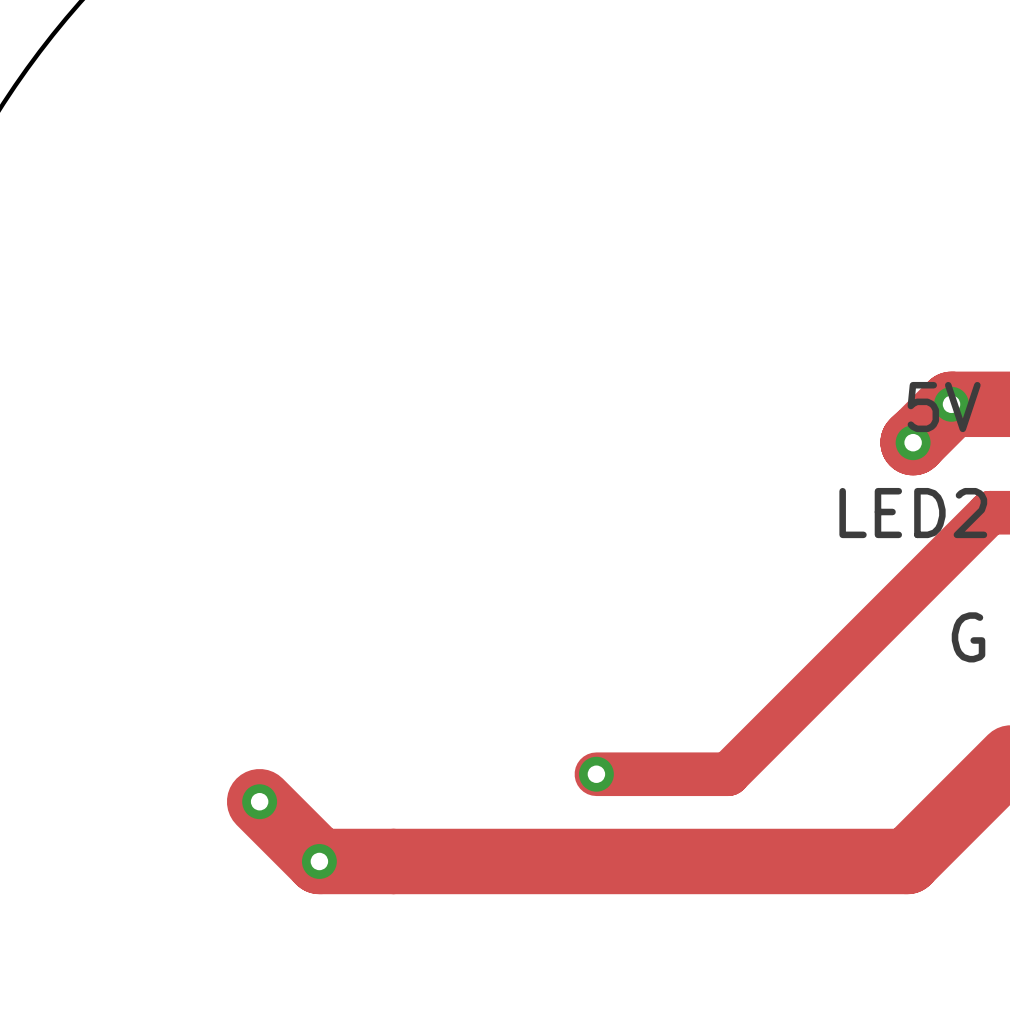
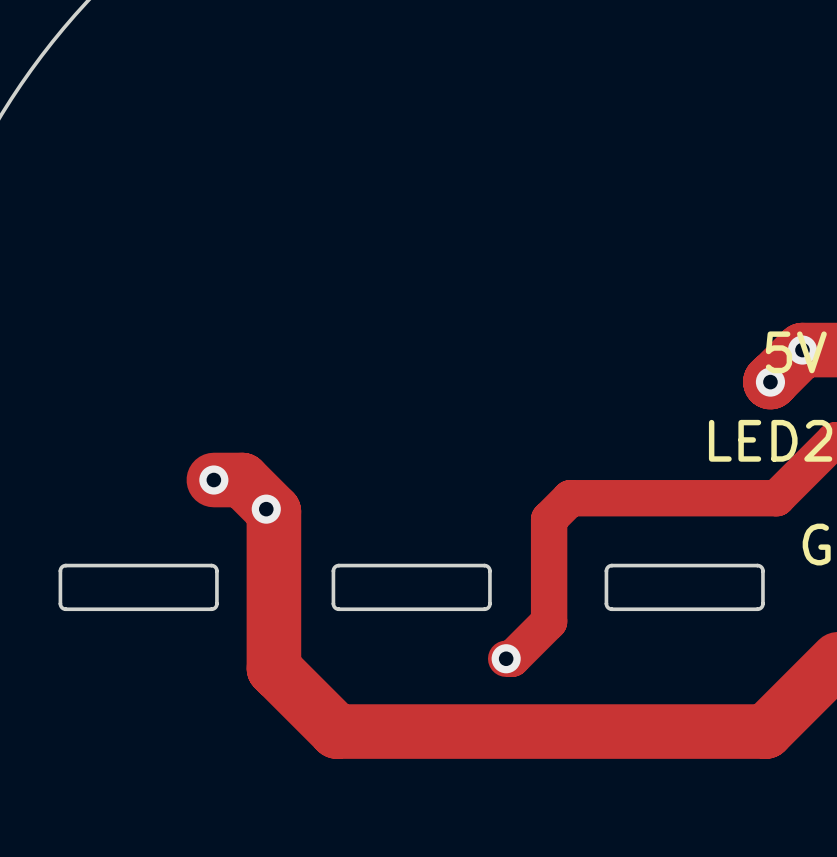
via: none -> (213, 480)
track: (920, 581) (728, 774) (603, 774) -> (776, 498) (570, 498) (549, 519) (549, 621) (511, 658)
via: none -> (266, 509)
board edge: none -> (65, 565) (212, 565) (216, 570) (216, 605) (211, 609) (64, 609) (60, 604) (60, 571) (62, 567) (65, 565)
board edge: none -> (338, 565) (485, 565) (489, 570) (489, 605) (484, 609) (337, 609) (333, 604) (333, 571) (335, 567) (338, 565)
board edge: none -> (611, 565) (758, 565) (762, 570) (762, 605) (757, 609) (610, 609) (606, 604) (606, 571) (608, 567) (611, 565)
track: (259, 801) (319, 861) (393, 861) -> (213, 480) (242, 480) (273, 511) (273, 668) (336, 731)
via: (259, 801) -> none
via: (319, 861) -> none

